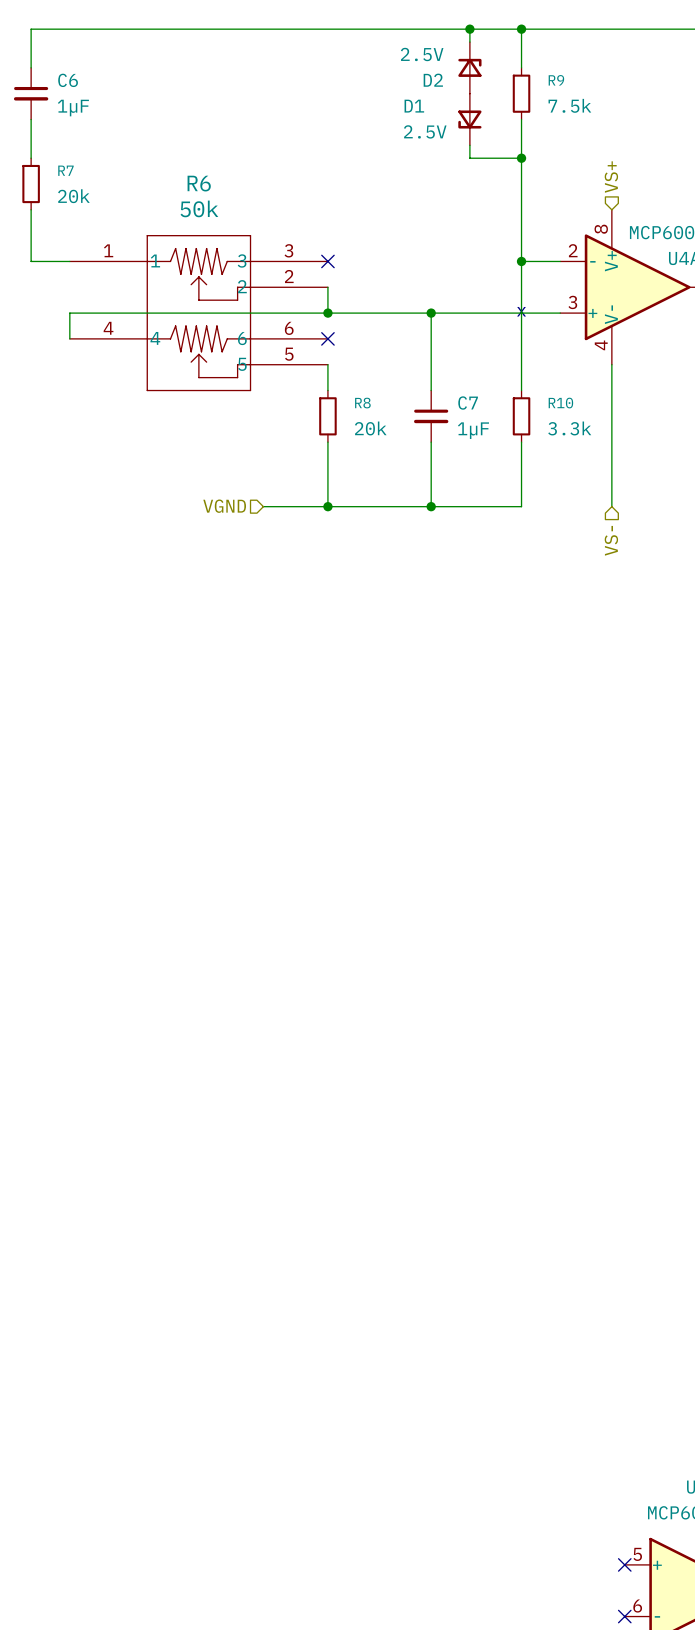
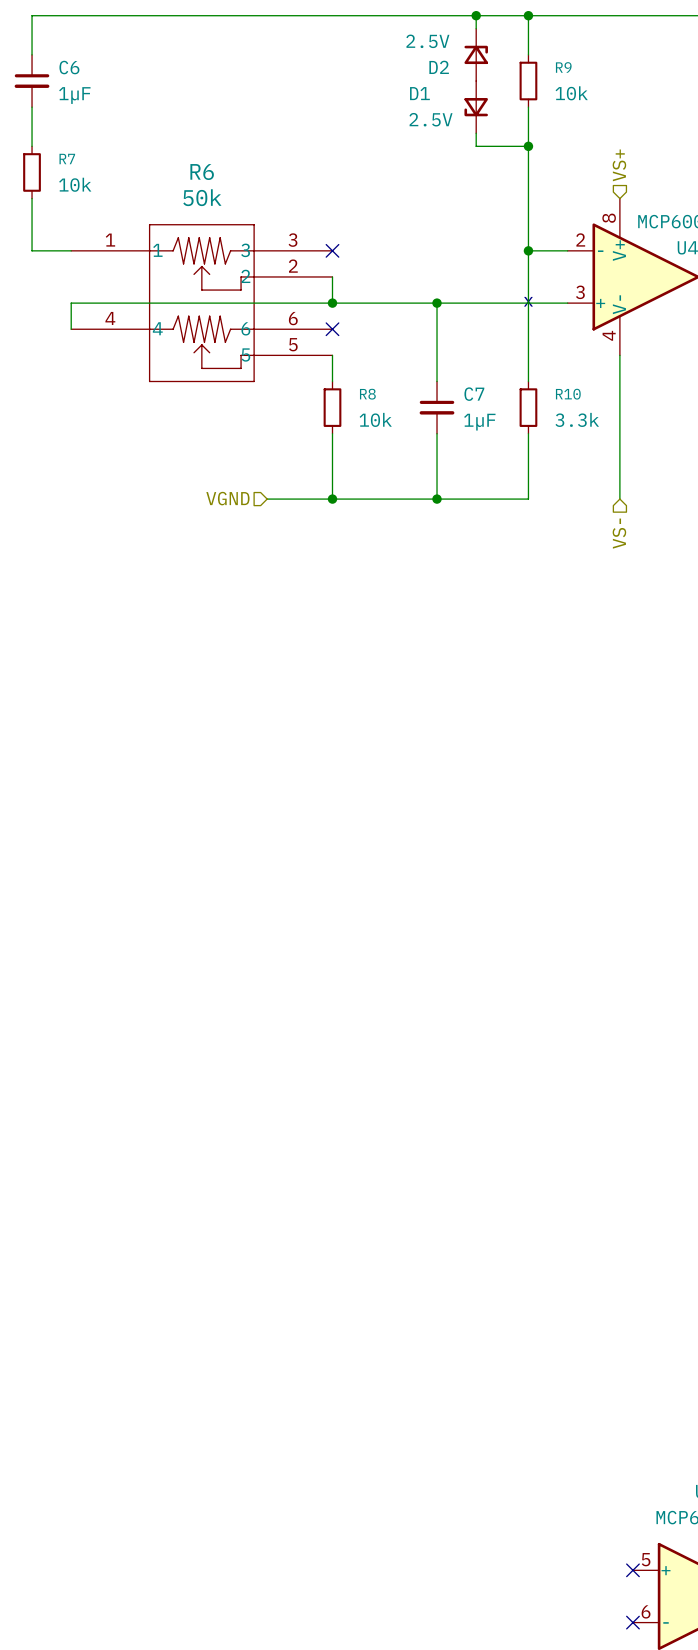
R9 value: 7.5k (569, 105) -> 10k (571, 93)
R7 value: 20k (73, 196) -> 10k (75, 184)
R8 value: 20k (370, 428) -> 10k (375, 419)

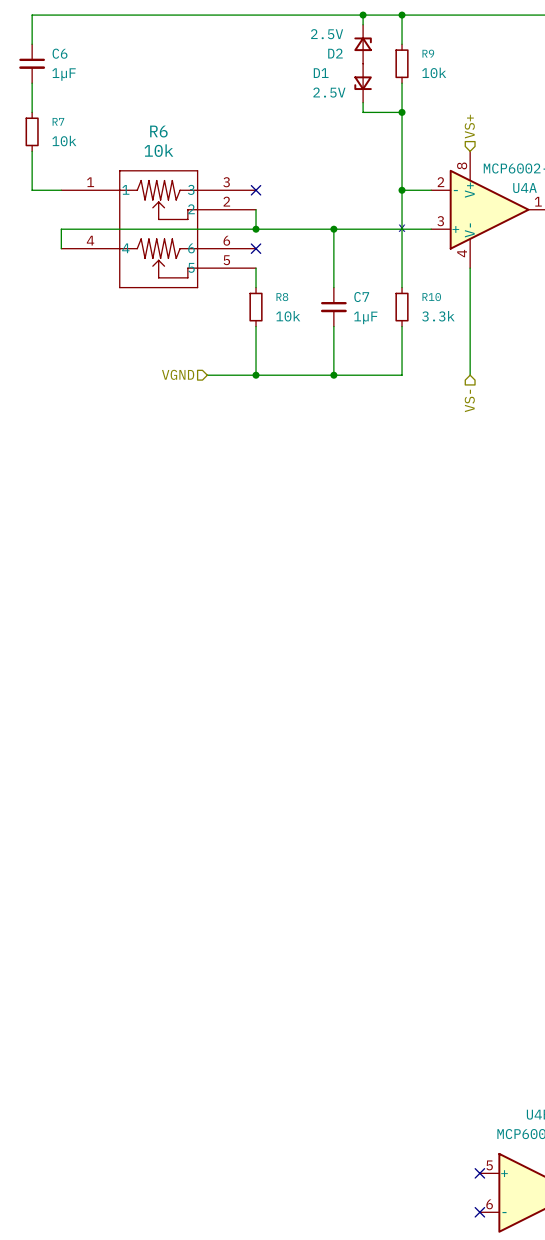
R6 value: 50k (202, 197) -> 10k (158, 150)

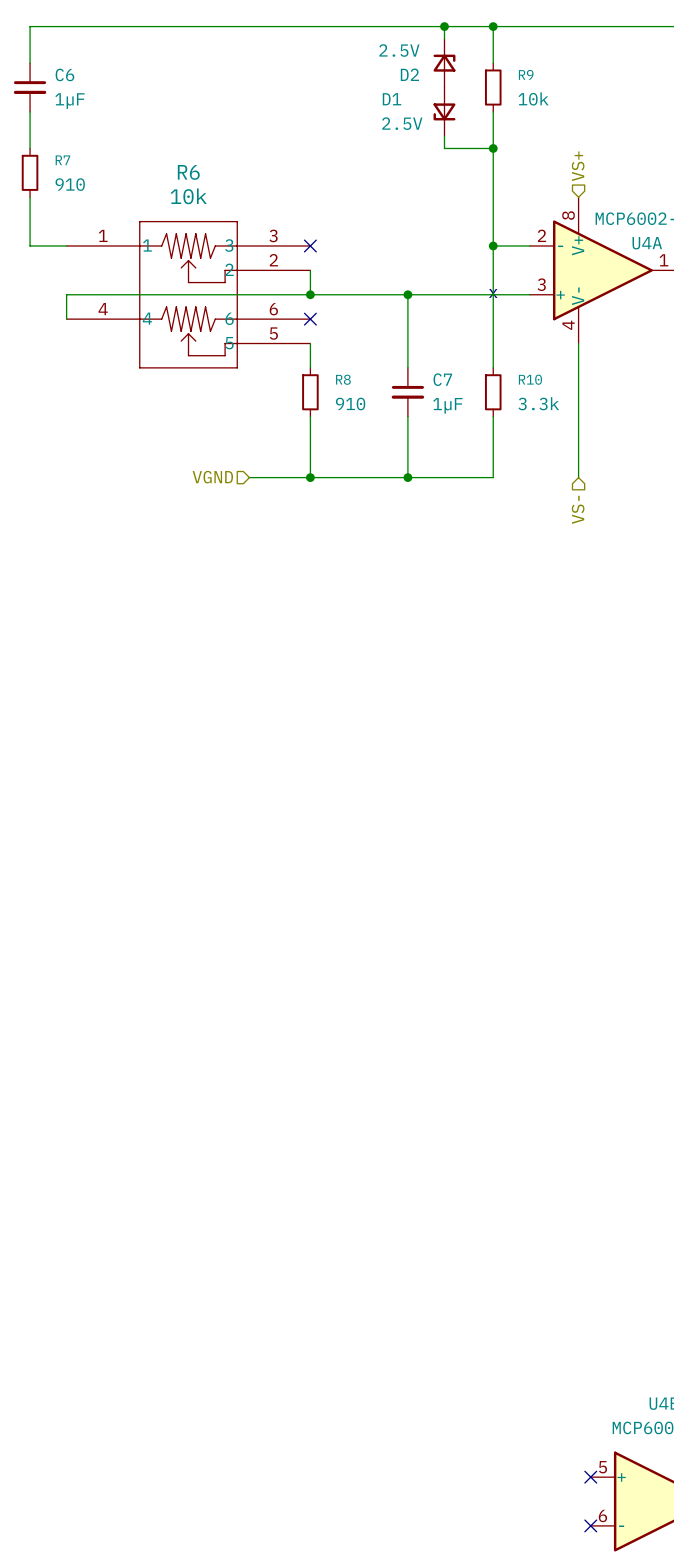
R7 value: 10k (64, 141) -> 910 (70, 184)
R8 value: 10k (288, 316) -> 910 (350, 404)

